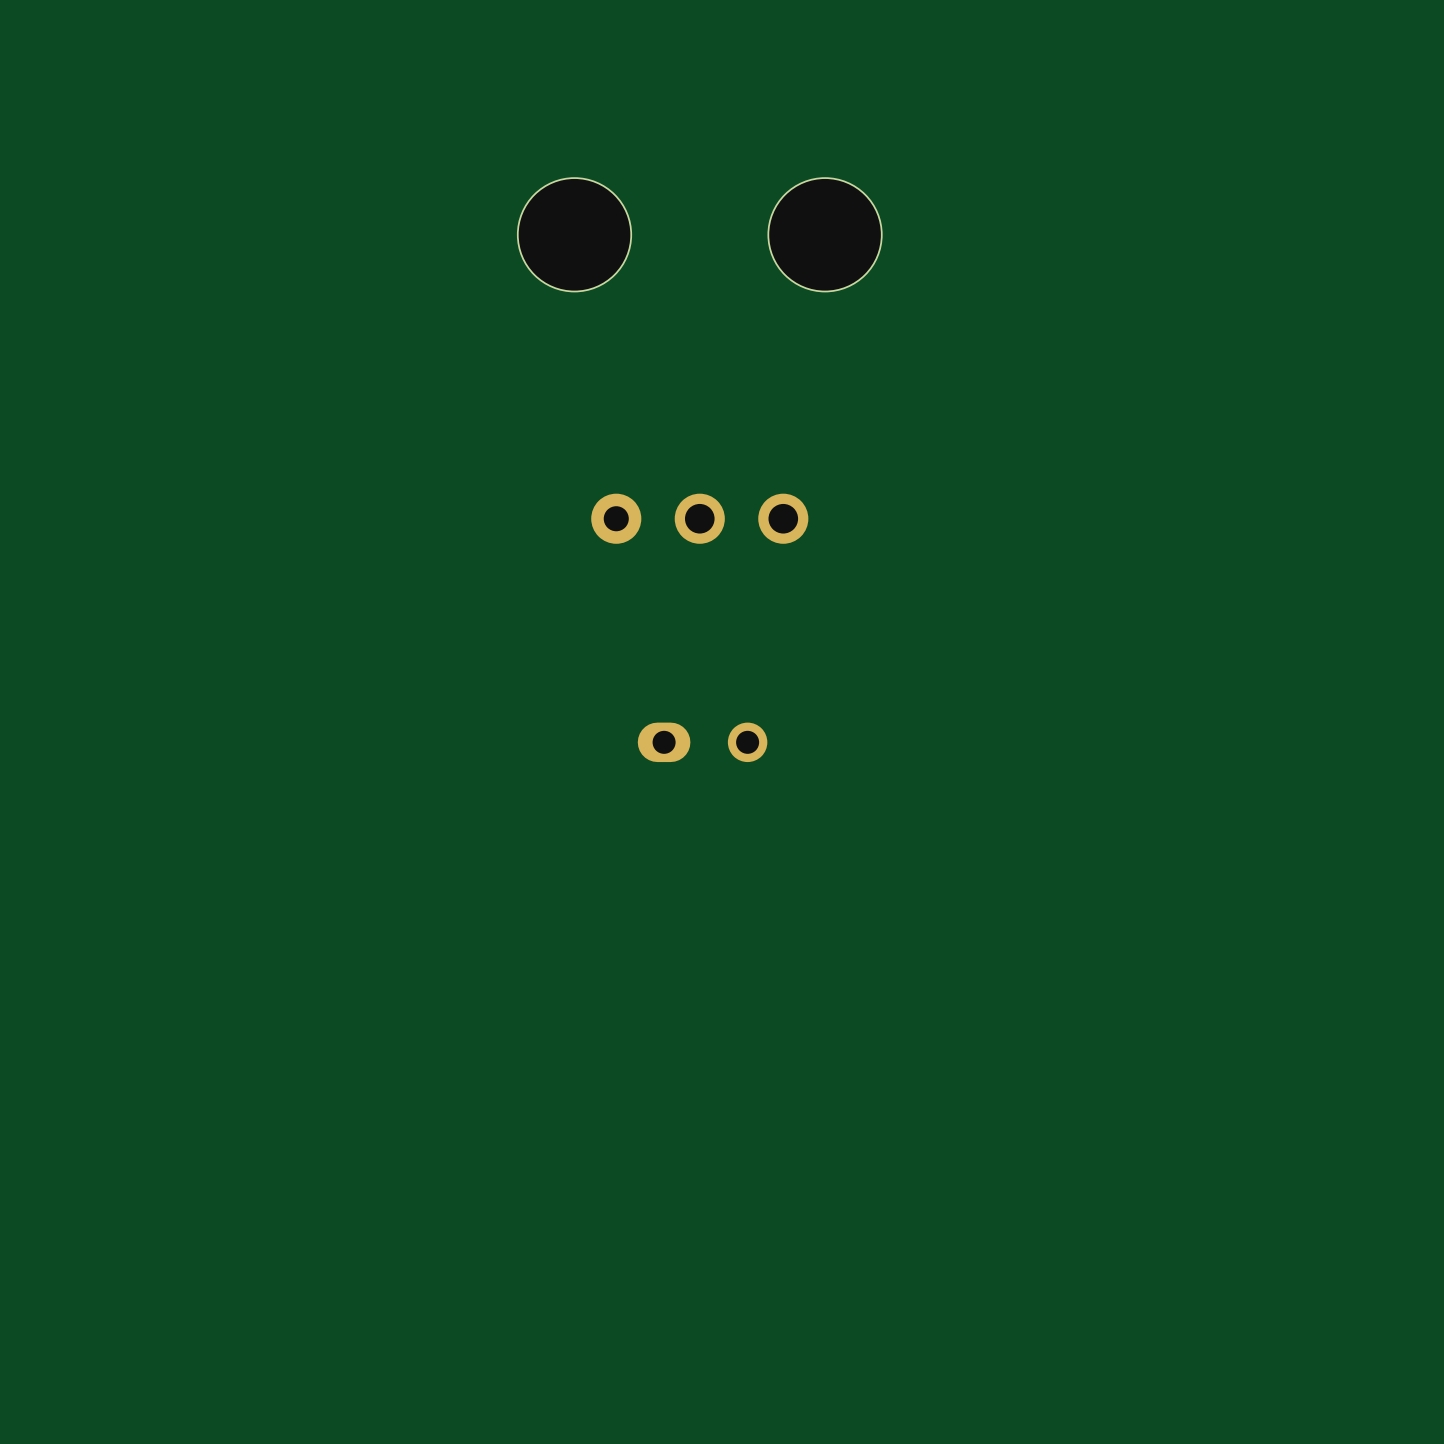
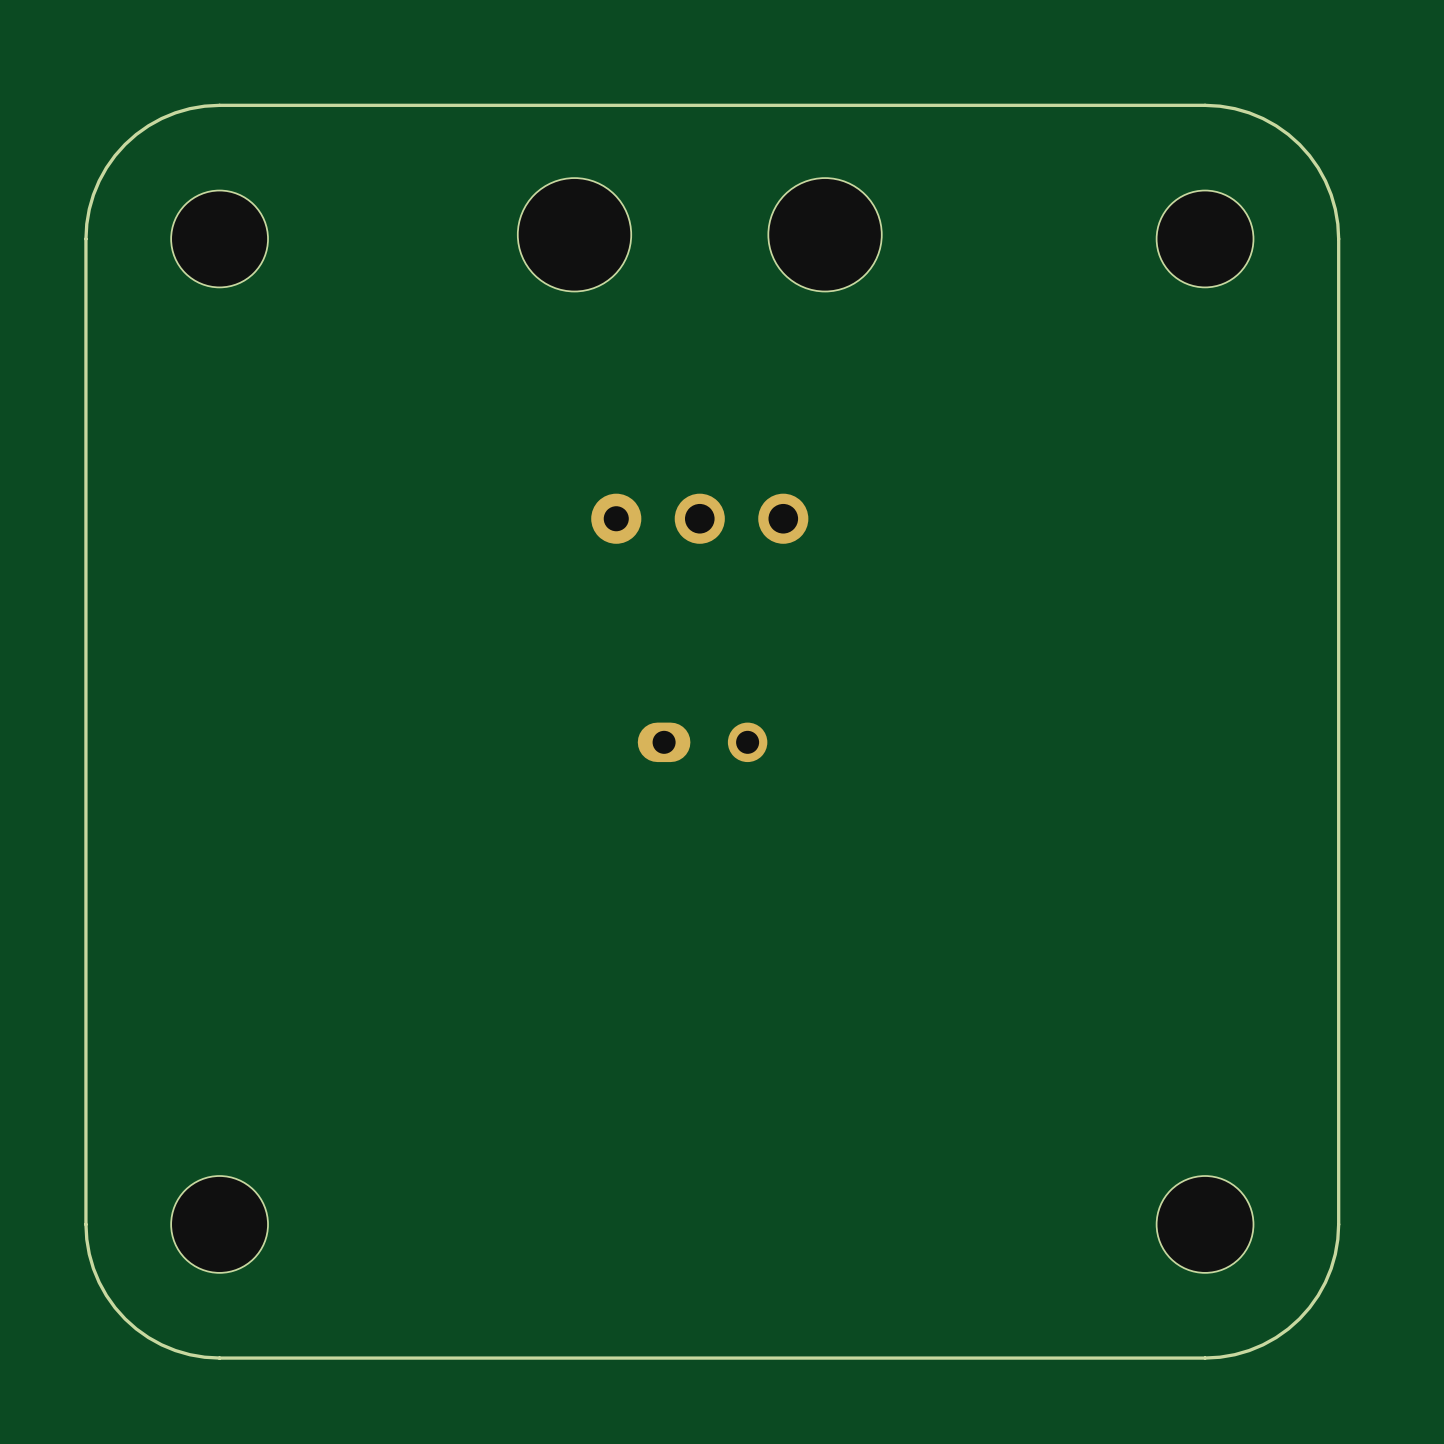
board edge: none -> (1205, 105) (219, 105) (189, 108) (161, 118) (136, 134) (115, 155) (106, 167) (93, 194) (89, 209) (85, 238) (85, 1224) (89, 1254) (99, 1282) (115, 1307) (136, 1328) (148, 1337) (175, 1350) (189, 1354) (219, 1358) (1205, 1358) (1234, 1354) (1263, 1344) (1288, 1328) (1309, 1307) (1318, 1295) (1331, 1268) (1335, 1254) (1338, 1224) (1337, 224) (1331, 194) (1318, 167) (1309, 155) (1288, 134) (1276, 125) (1249, 112) (1234, 108) (1205, 105)
part: none -> (219, 238)
part: none -> (1205, 238)
part: none -> (219, 1224)
part: none -> (1205, 1224)

